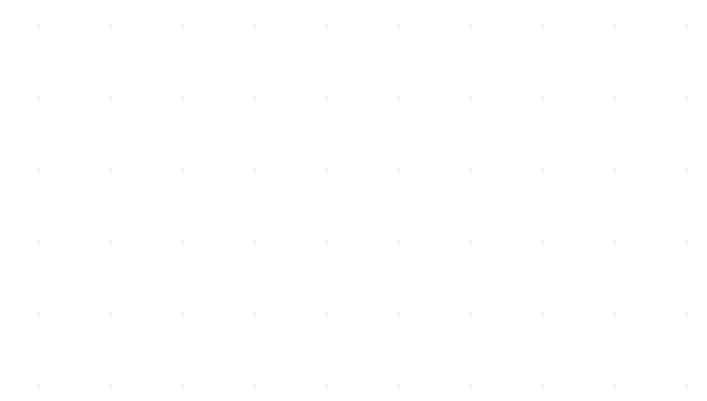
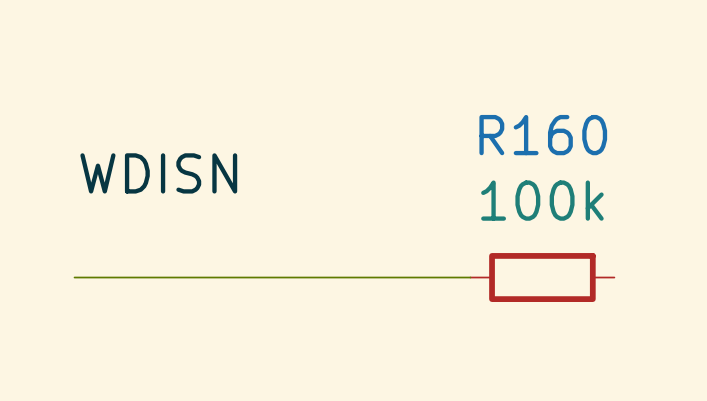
label: none -> WDISN (158, 173)
wire: none -> (74, 277) (470, 277)
R160: none -> 100k (542, 277)

